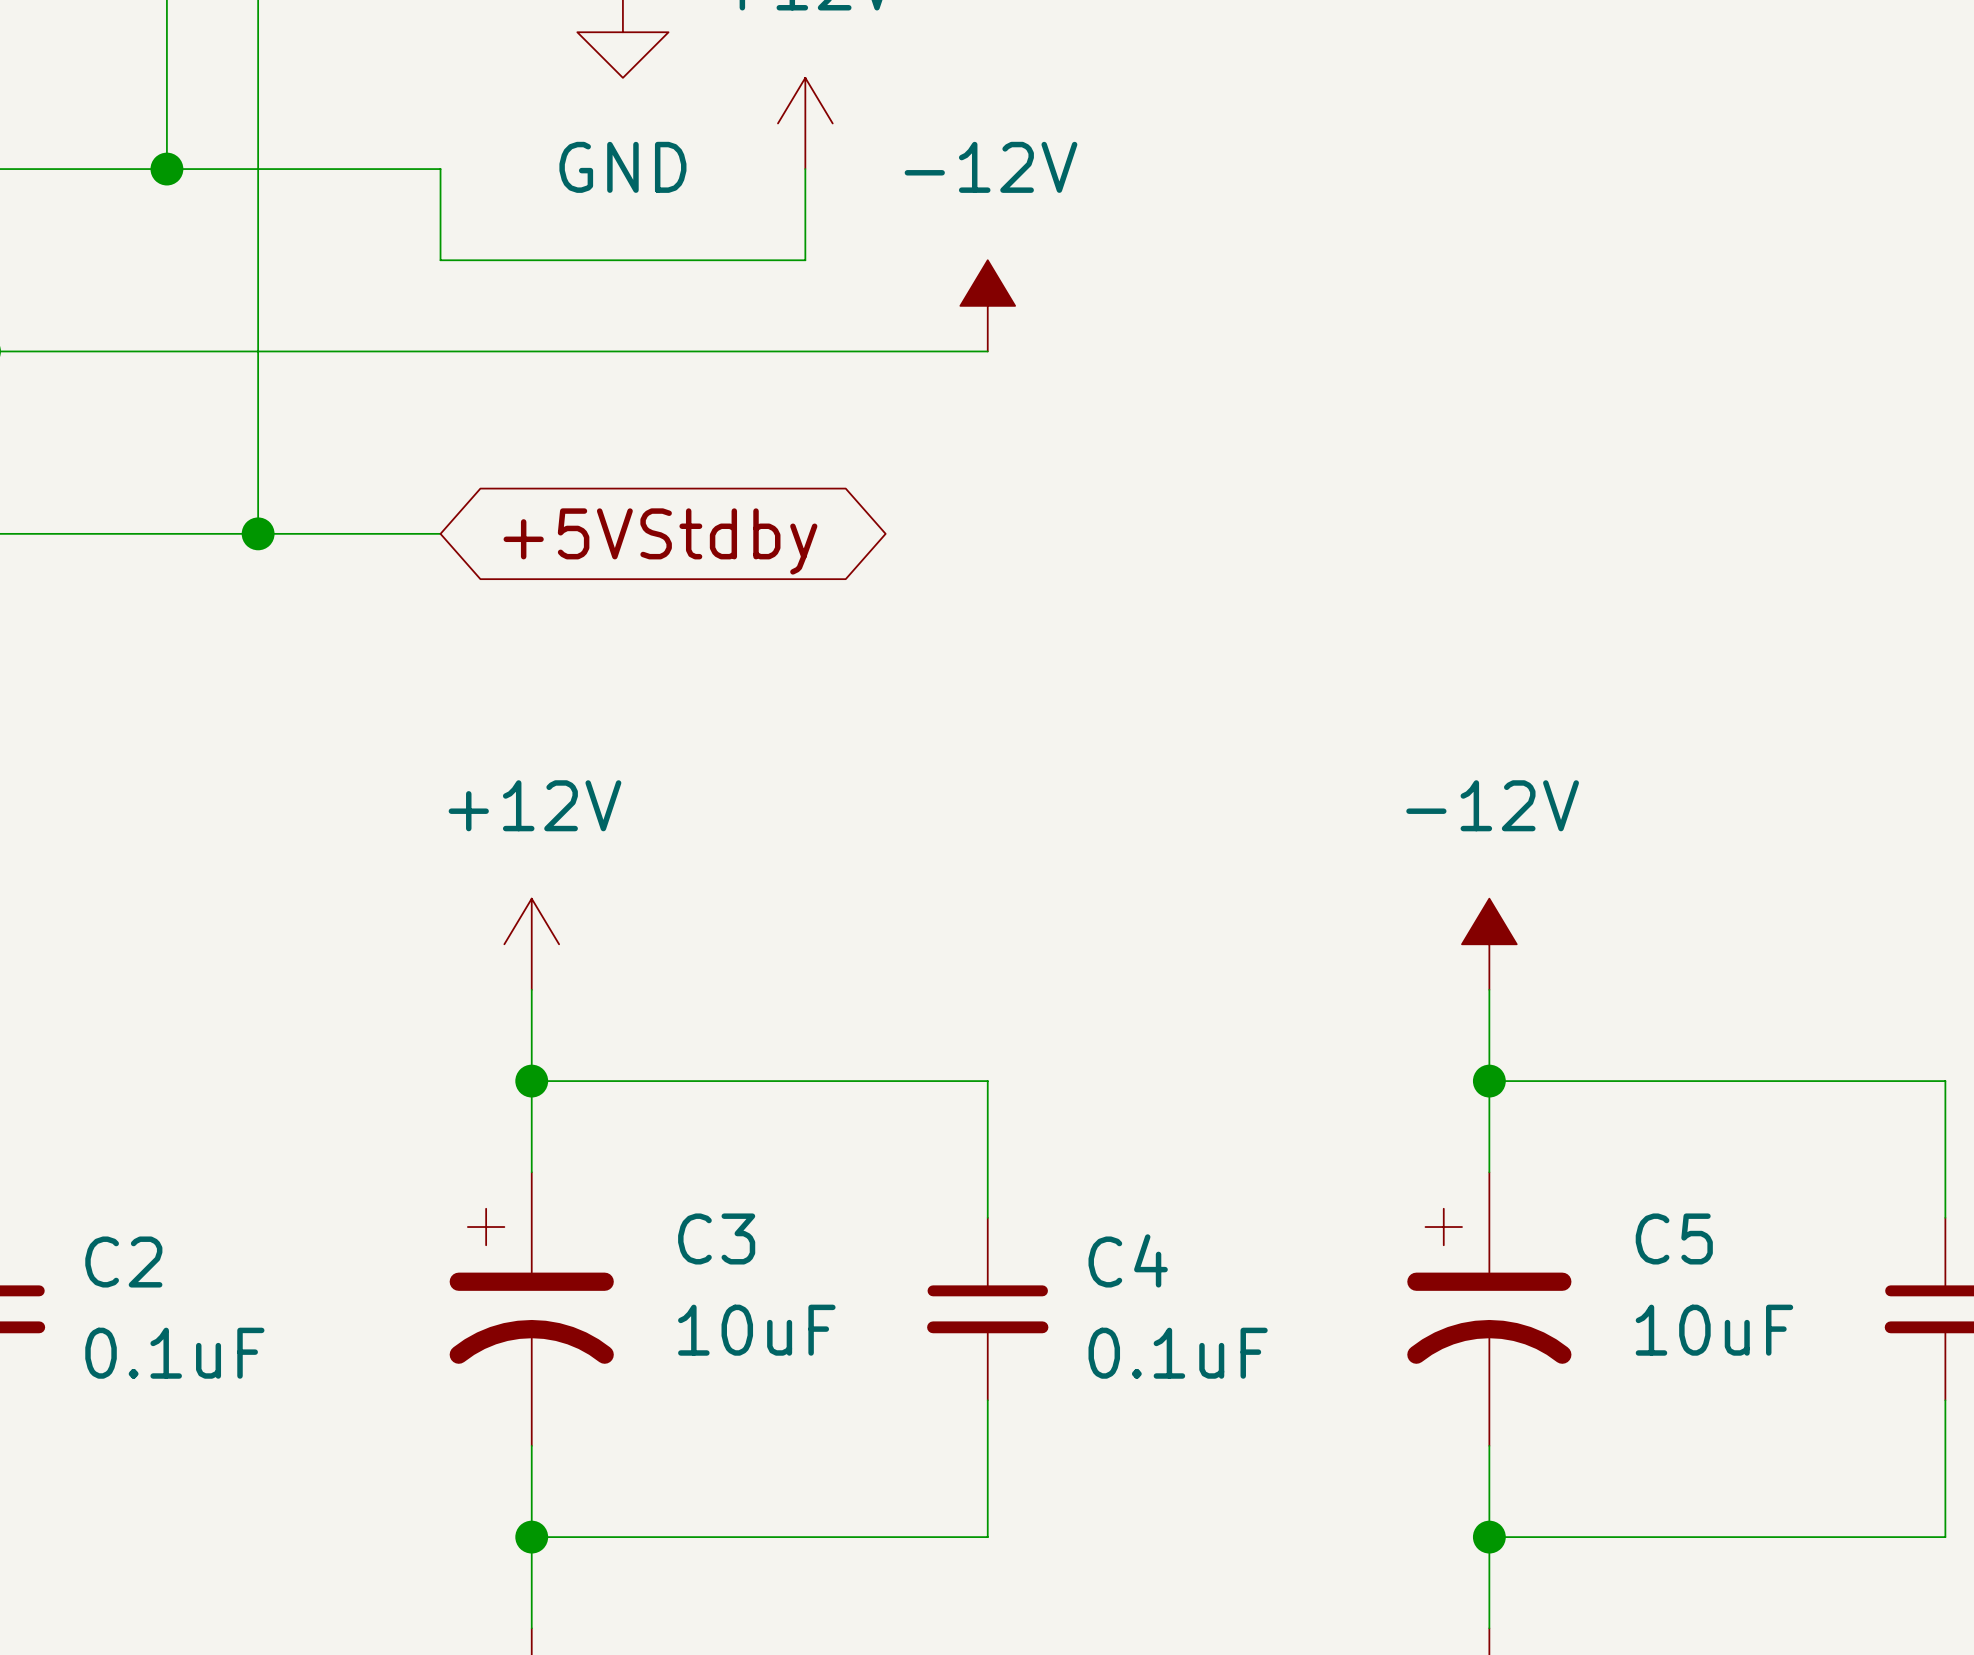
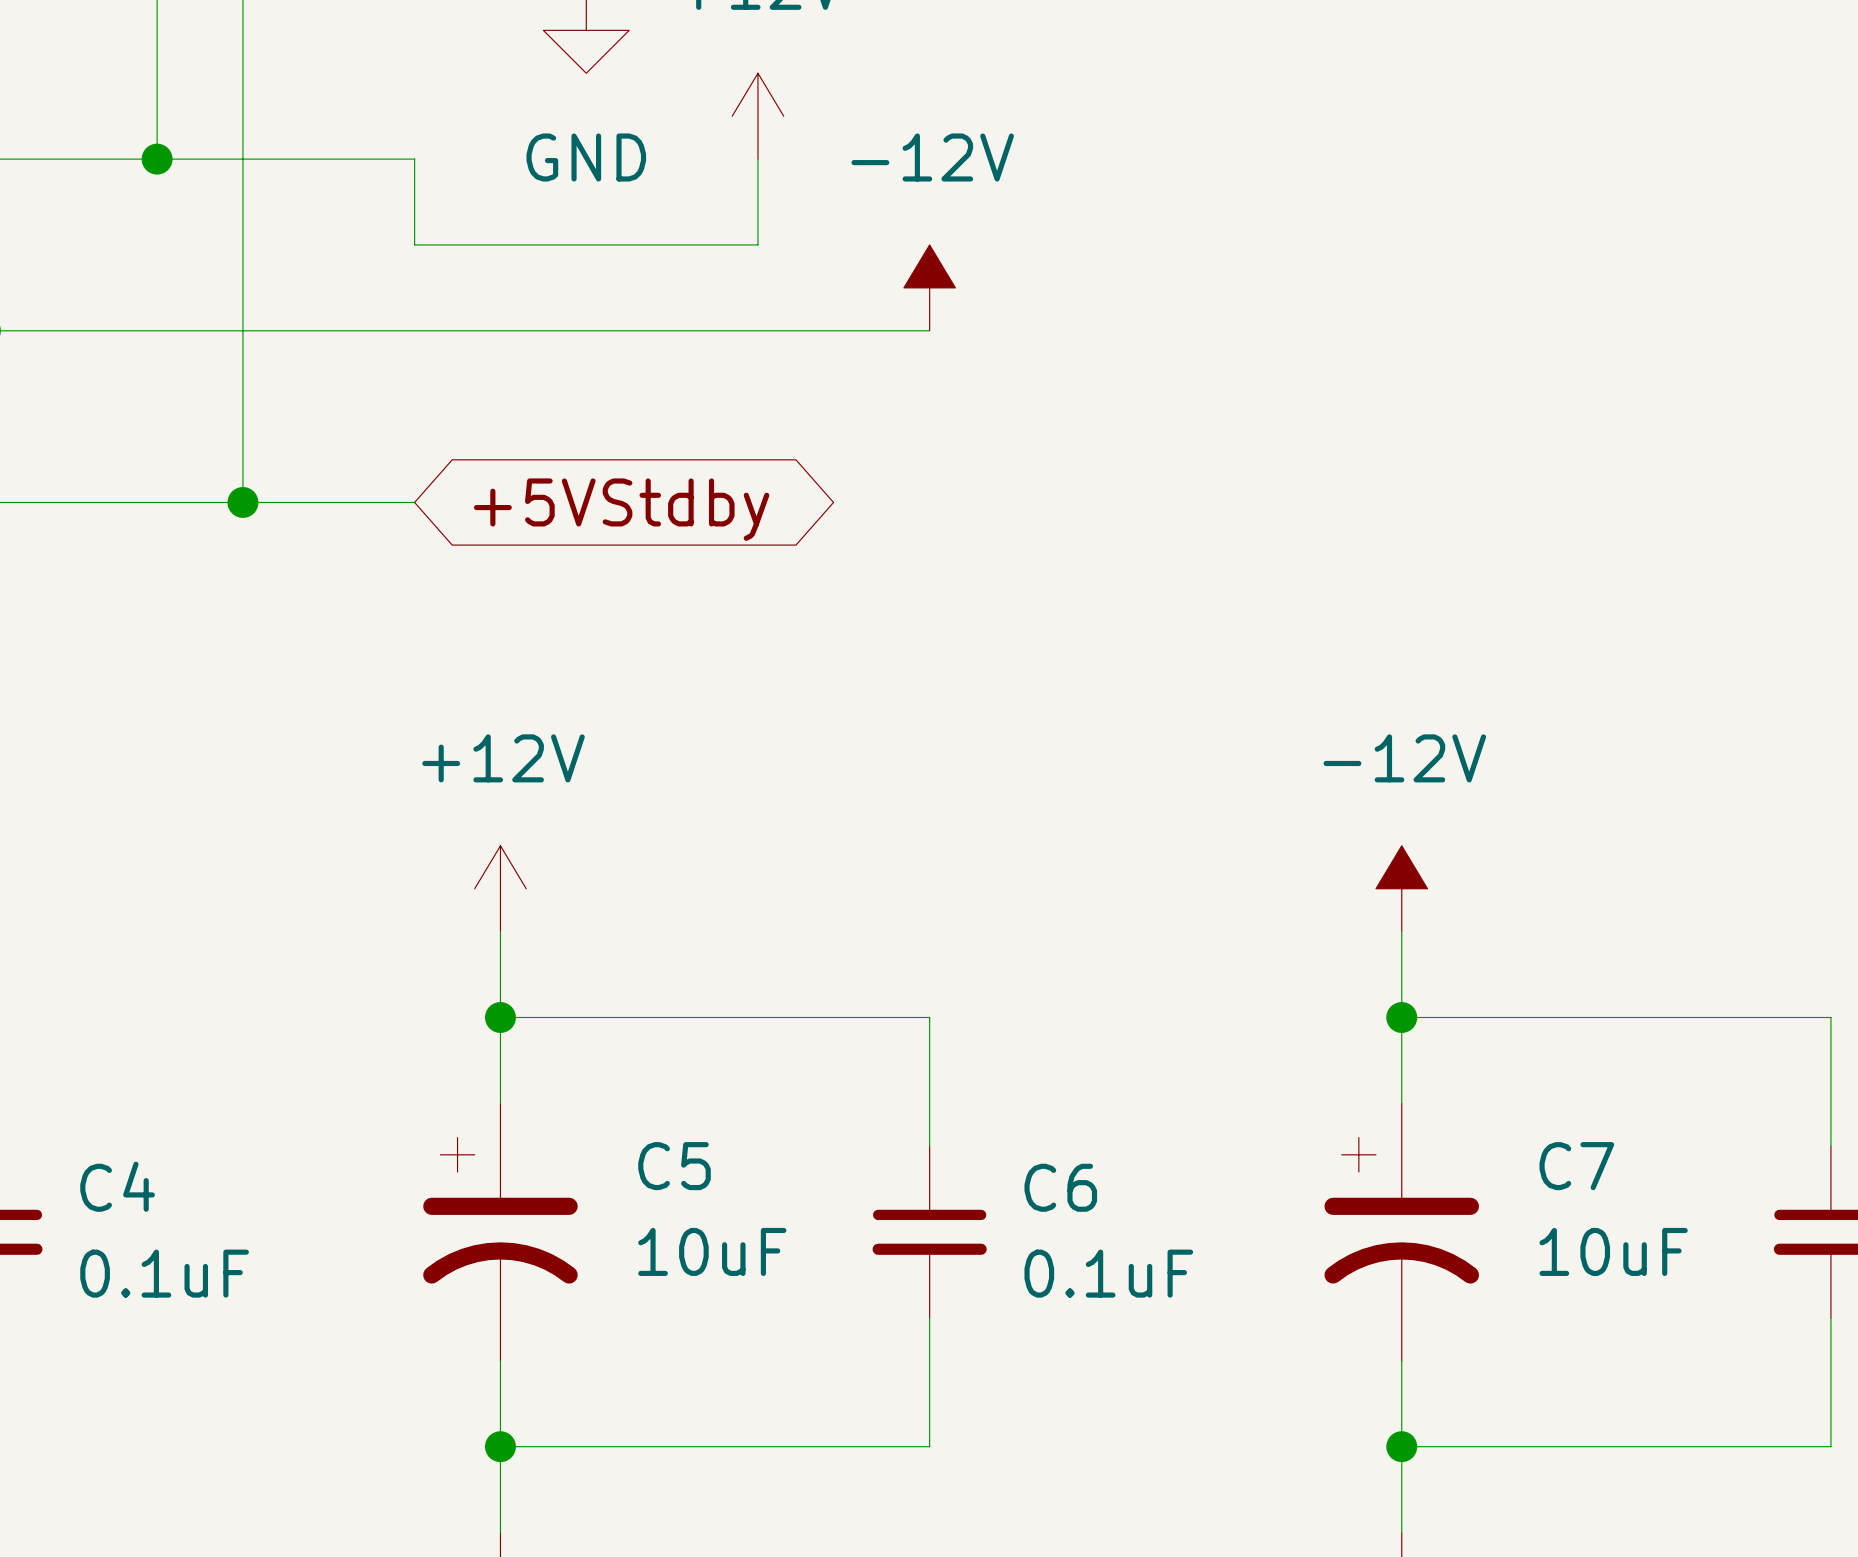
C3 name: C3 (716, 1238) -> C5 (674, 1166)
C5 name: C5 (1674, 1238) -> C7 (1576, 1166)
C4 name: C4 (1128, 1260) -> C6 (1060, 1187)
C2 name: C2 (123, 1262) -> C4 (117, 1186)

